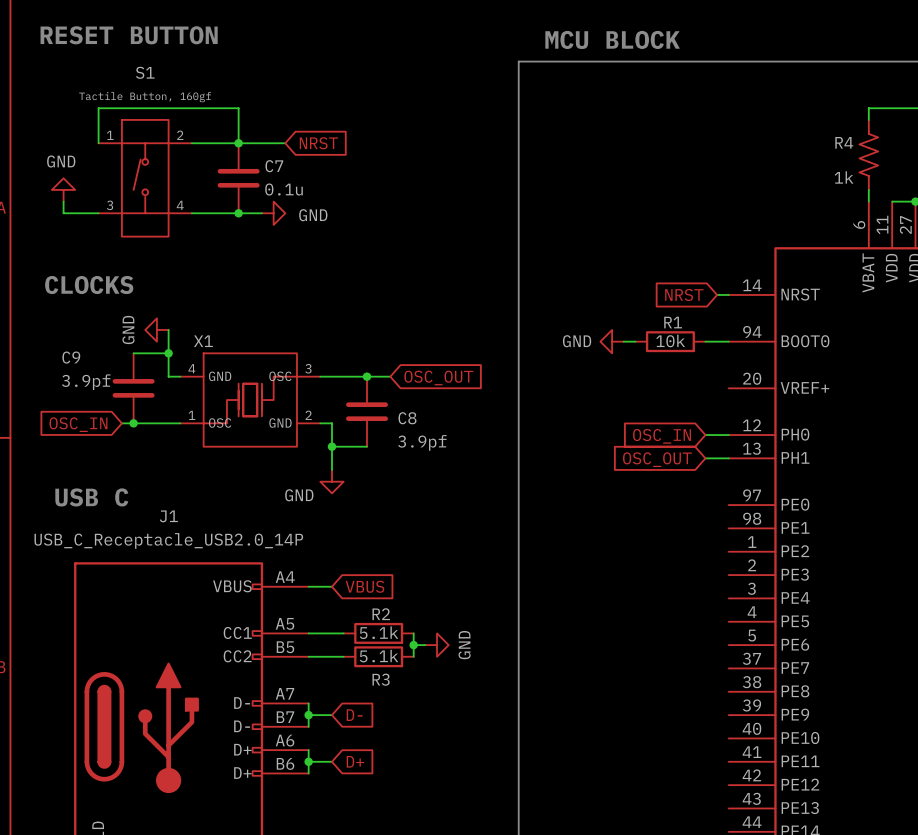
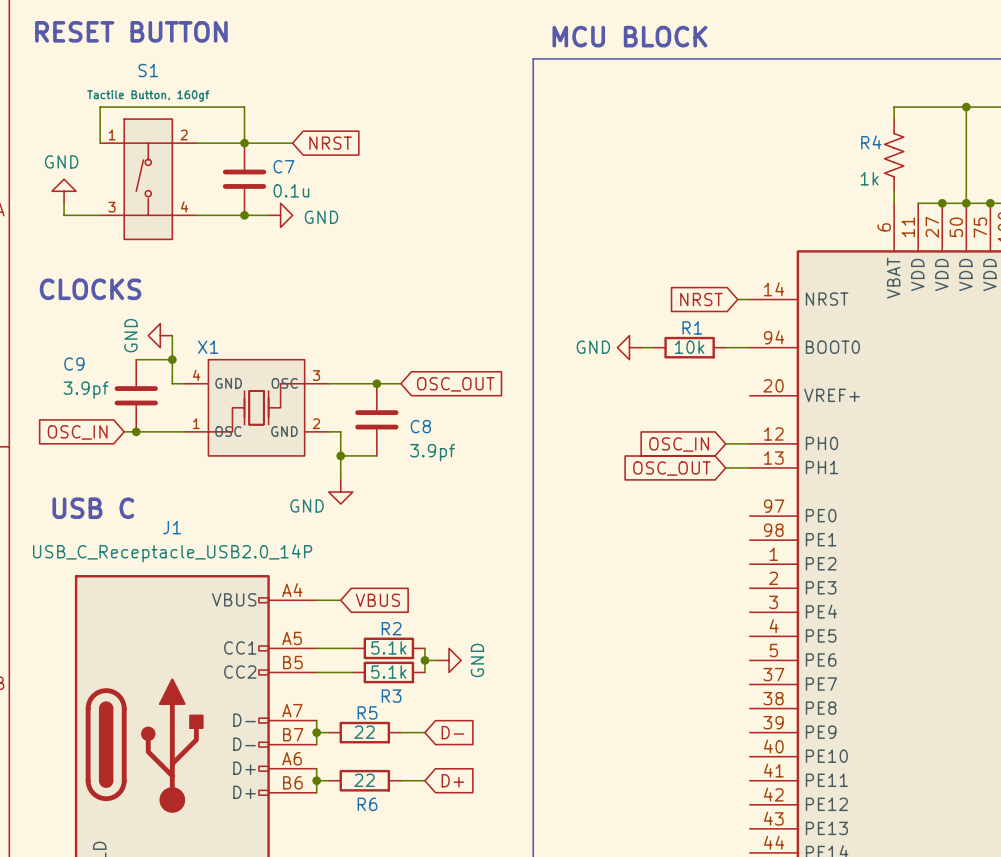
global label position: D- (354, 715) -> D- (452, 732)
R5: none -> 22 (364, 732)
wire: none -> (400, 732) (424, 732)
global label position: D+ (355, 761) -> D+ (452, 780)
R6: none -> 22 (364, 780)
wire: none -> (400, 780) (424, 780)

